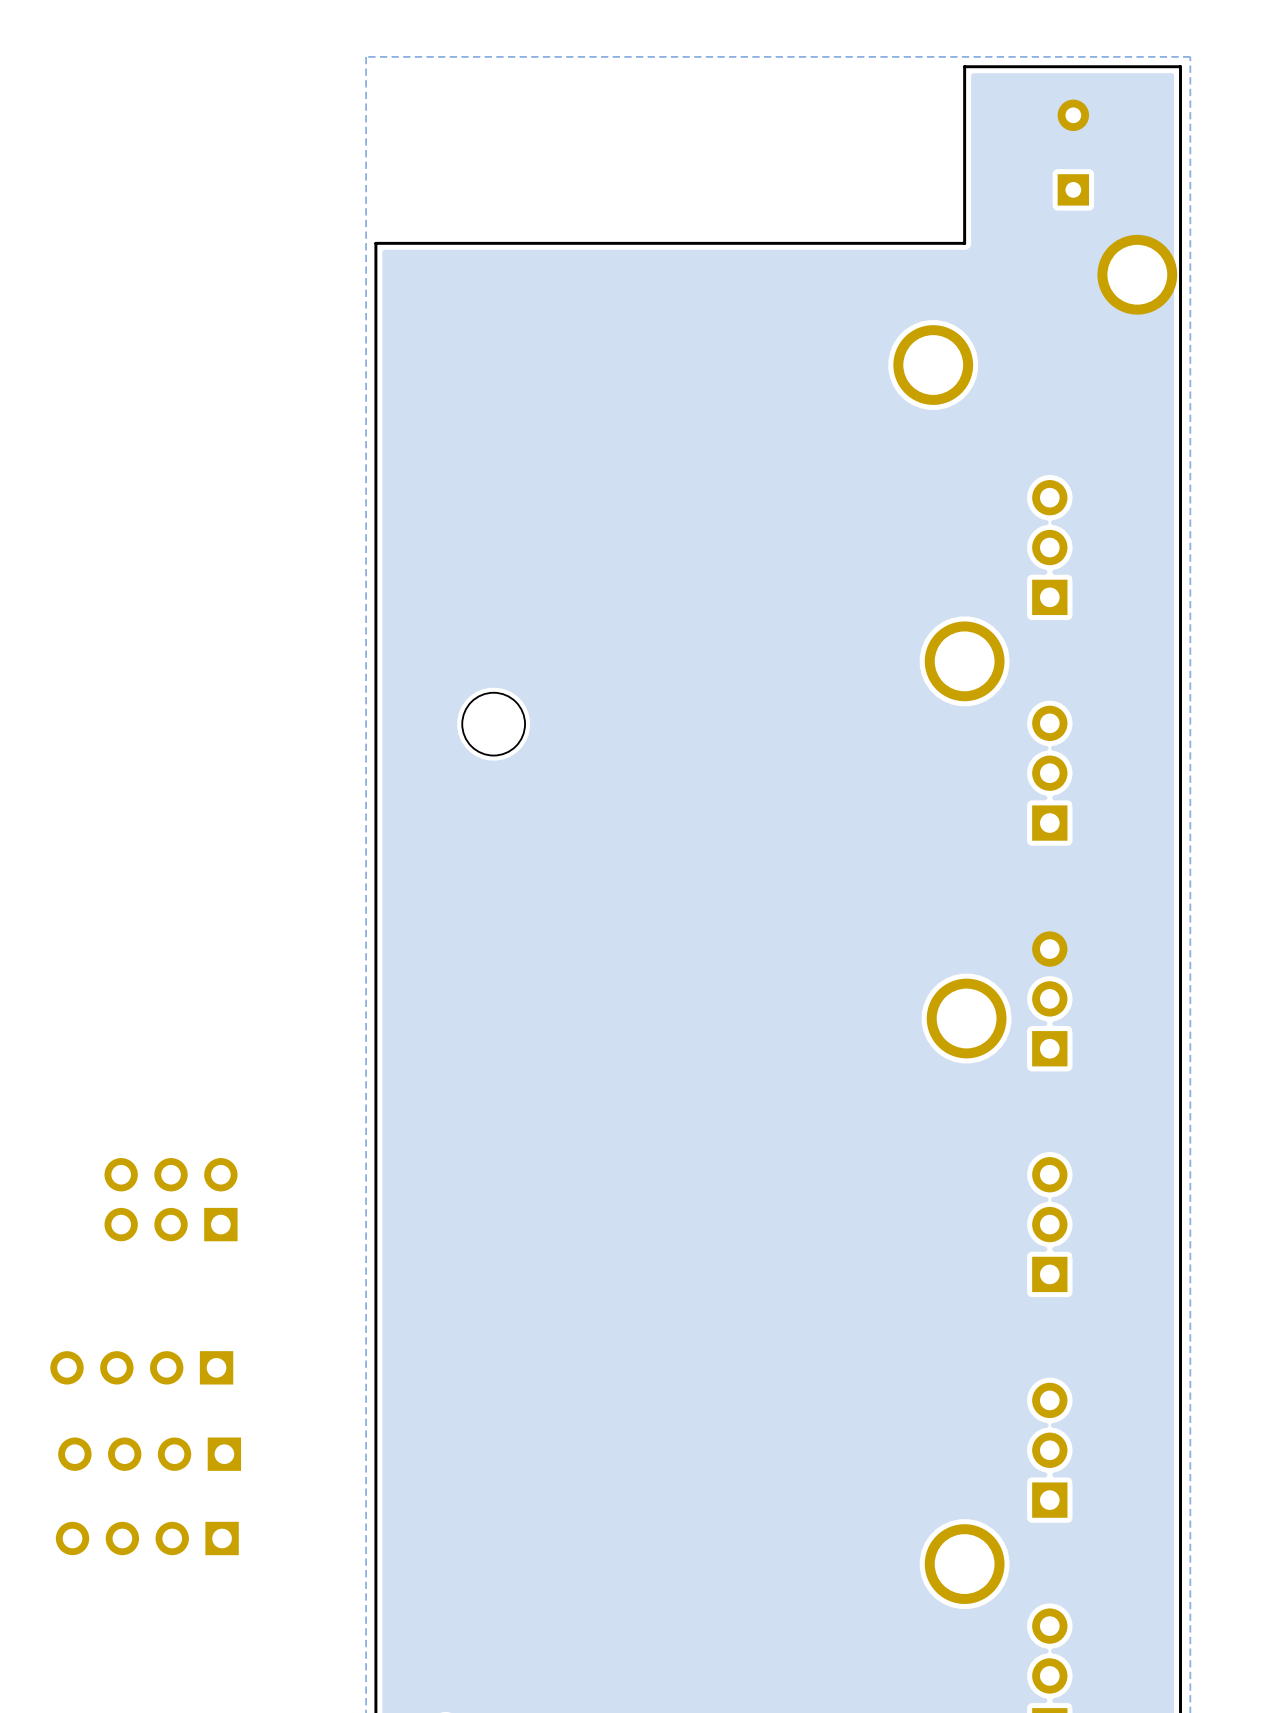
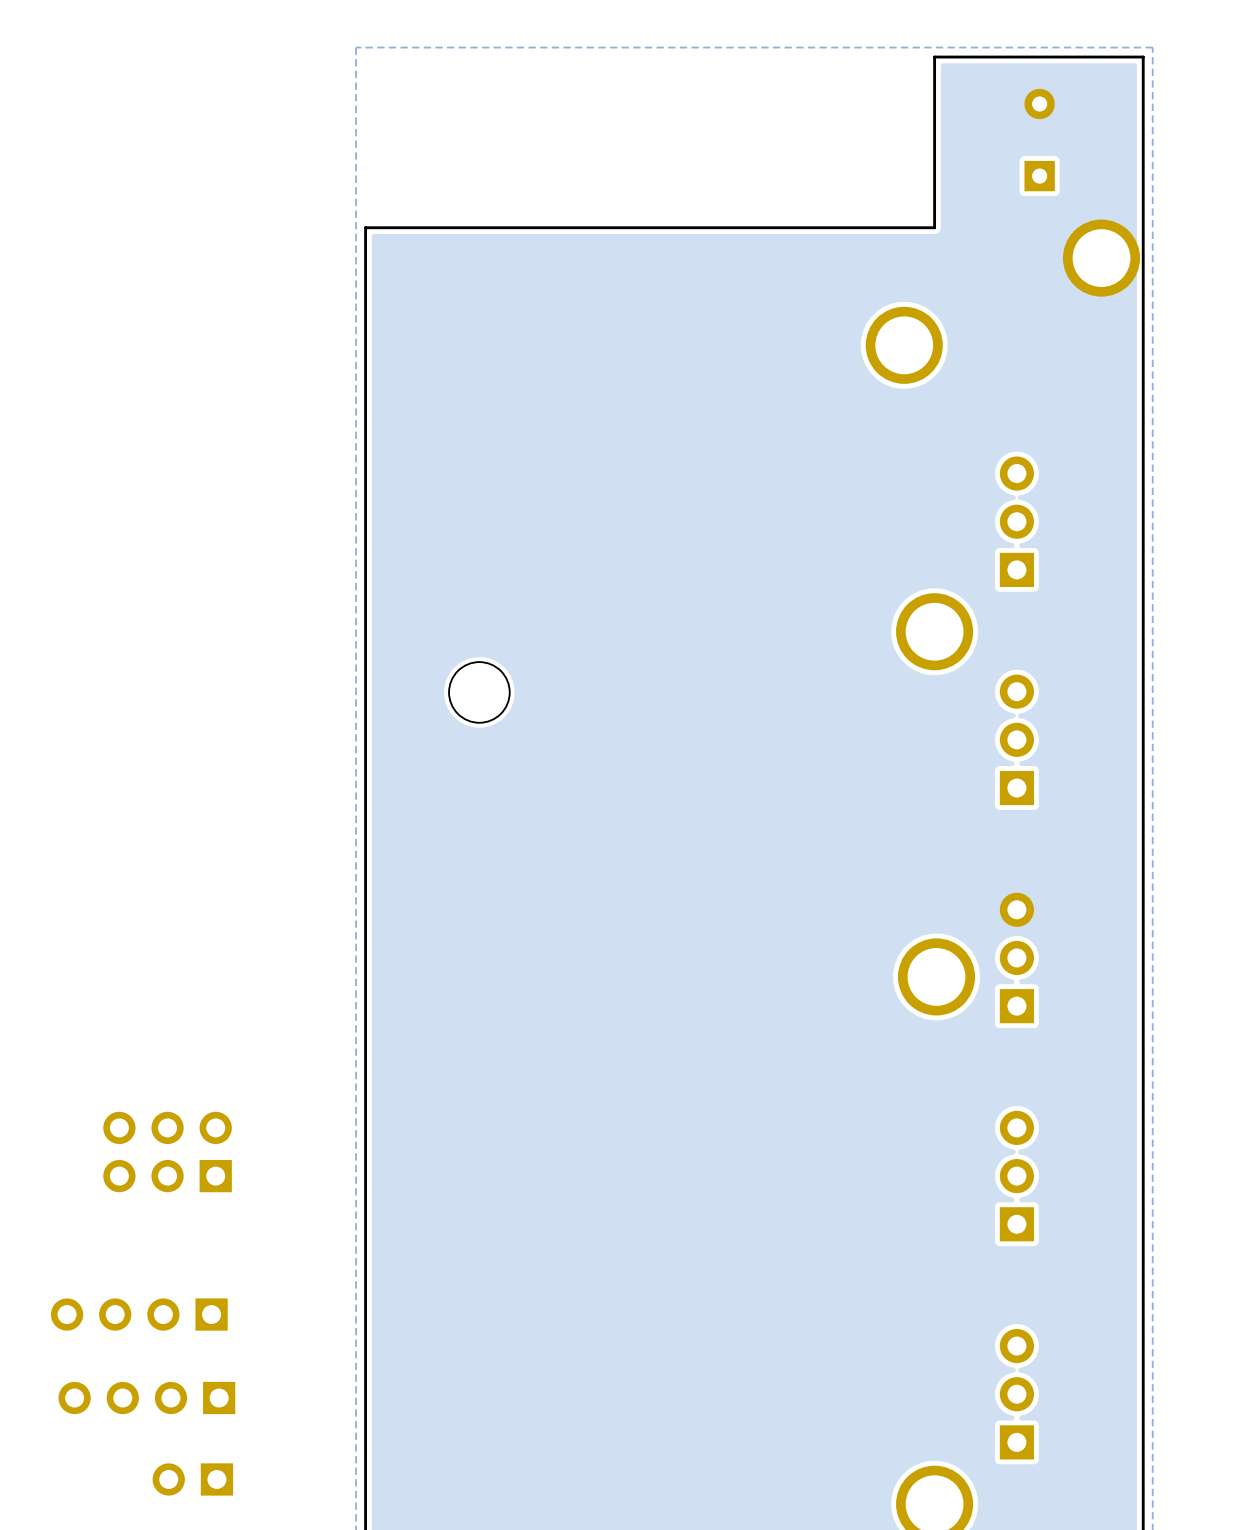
part: (147, 1538) -> none

